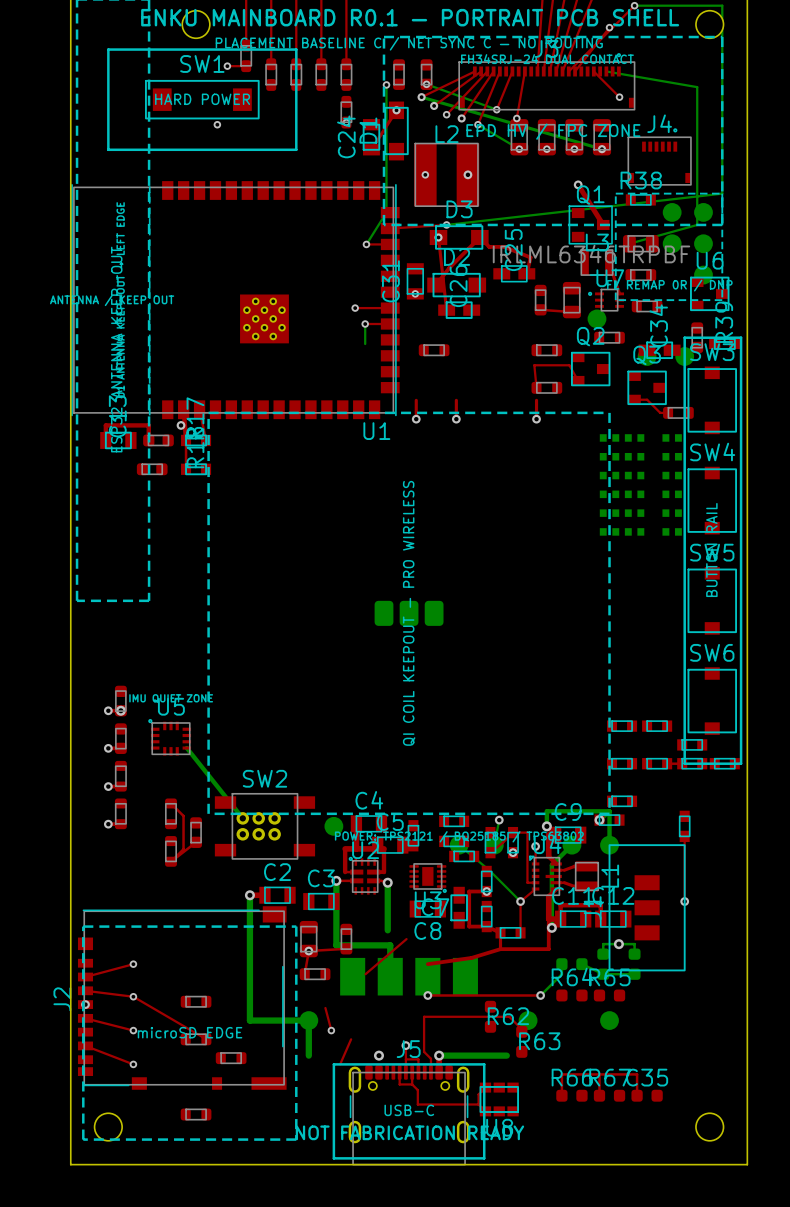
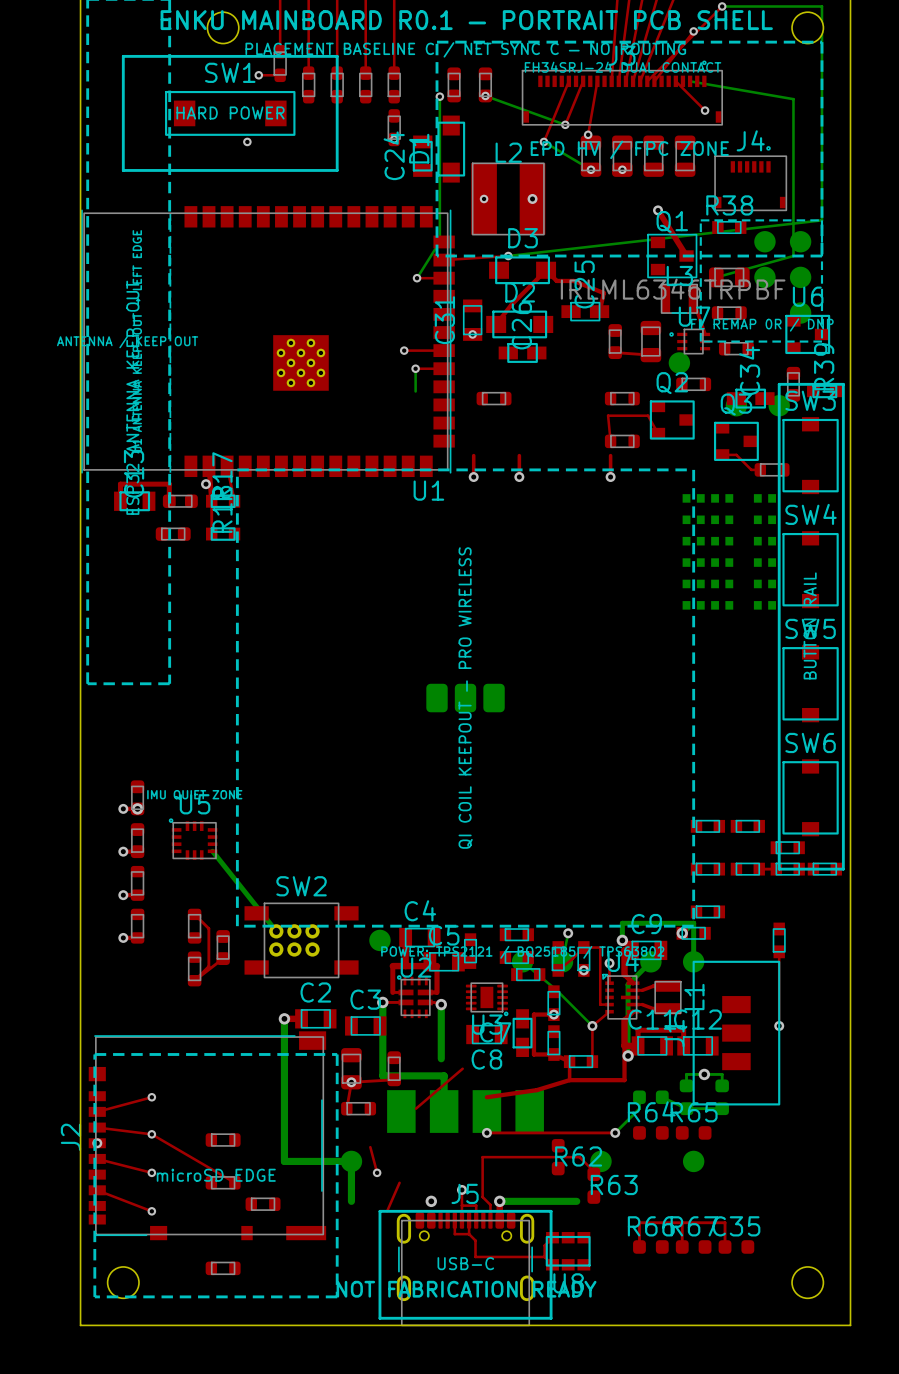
top track: (474, 71) (421, 97) -> none
top track: (481, 71) (434, 105) -> none
top track: (487, 71) (446, 114) -> none
top track: (493, 71) (461, 118) -> none
bottom track: (421, 97) (602, 149) -> none
via: (421, 97) -> none
via: (434, 105) -> none
top track: (396, 110) (371, 149) -> none
via: (396, 110) -> none
via: (446, 114) -> none
via: (461, 118) -> none
via: (574, 149) -> none
via: (602, 149) -> none
top track: (438, 237) (446, 310) -> none
via: (438, 237) -> none

